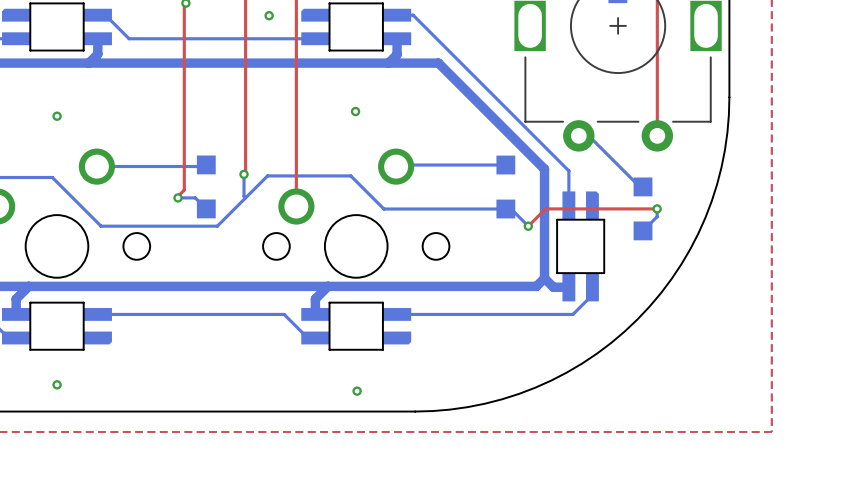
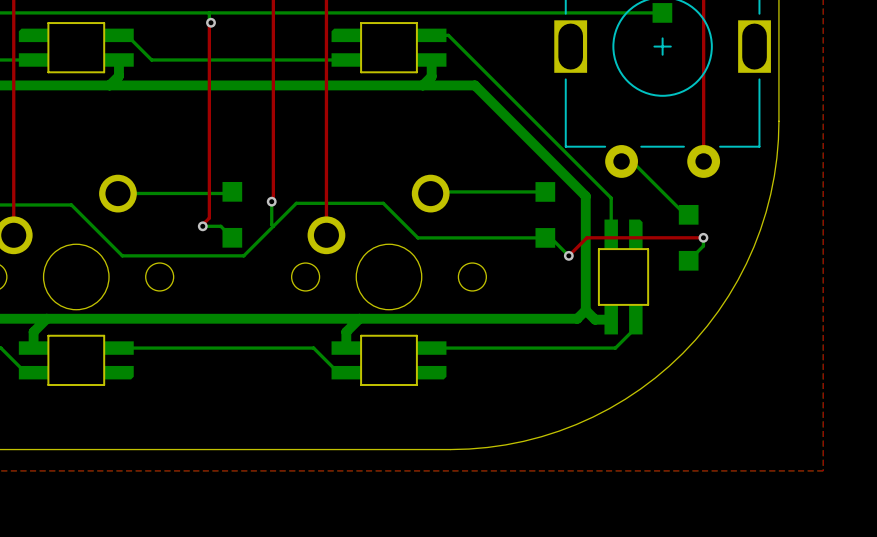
via: (269, 15) -> none
via: (355, 111) -> none
via: (57, 116) -> none
via: (57, 384) -> none
via: (357, 391) -> none

